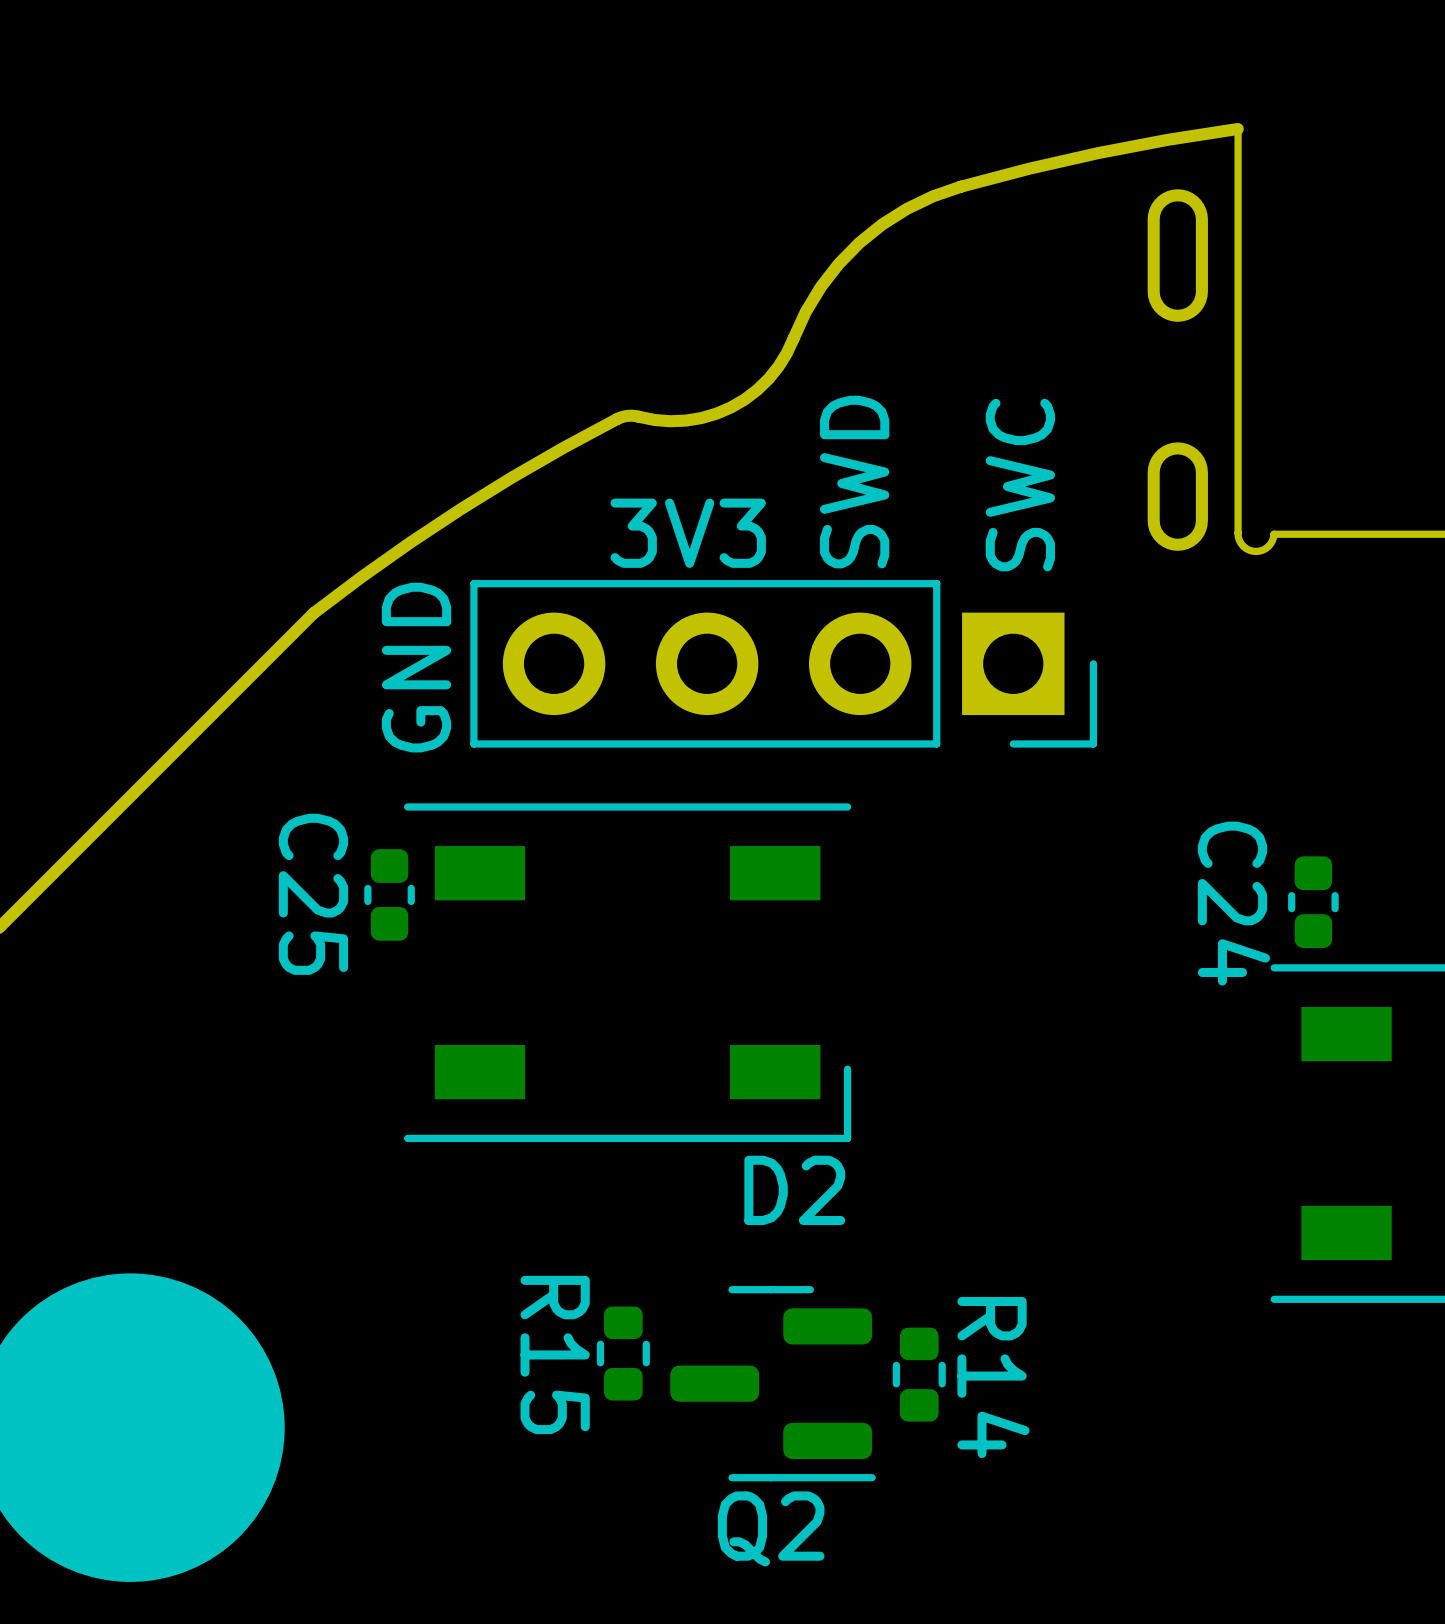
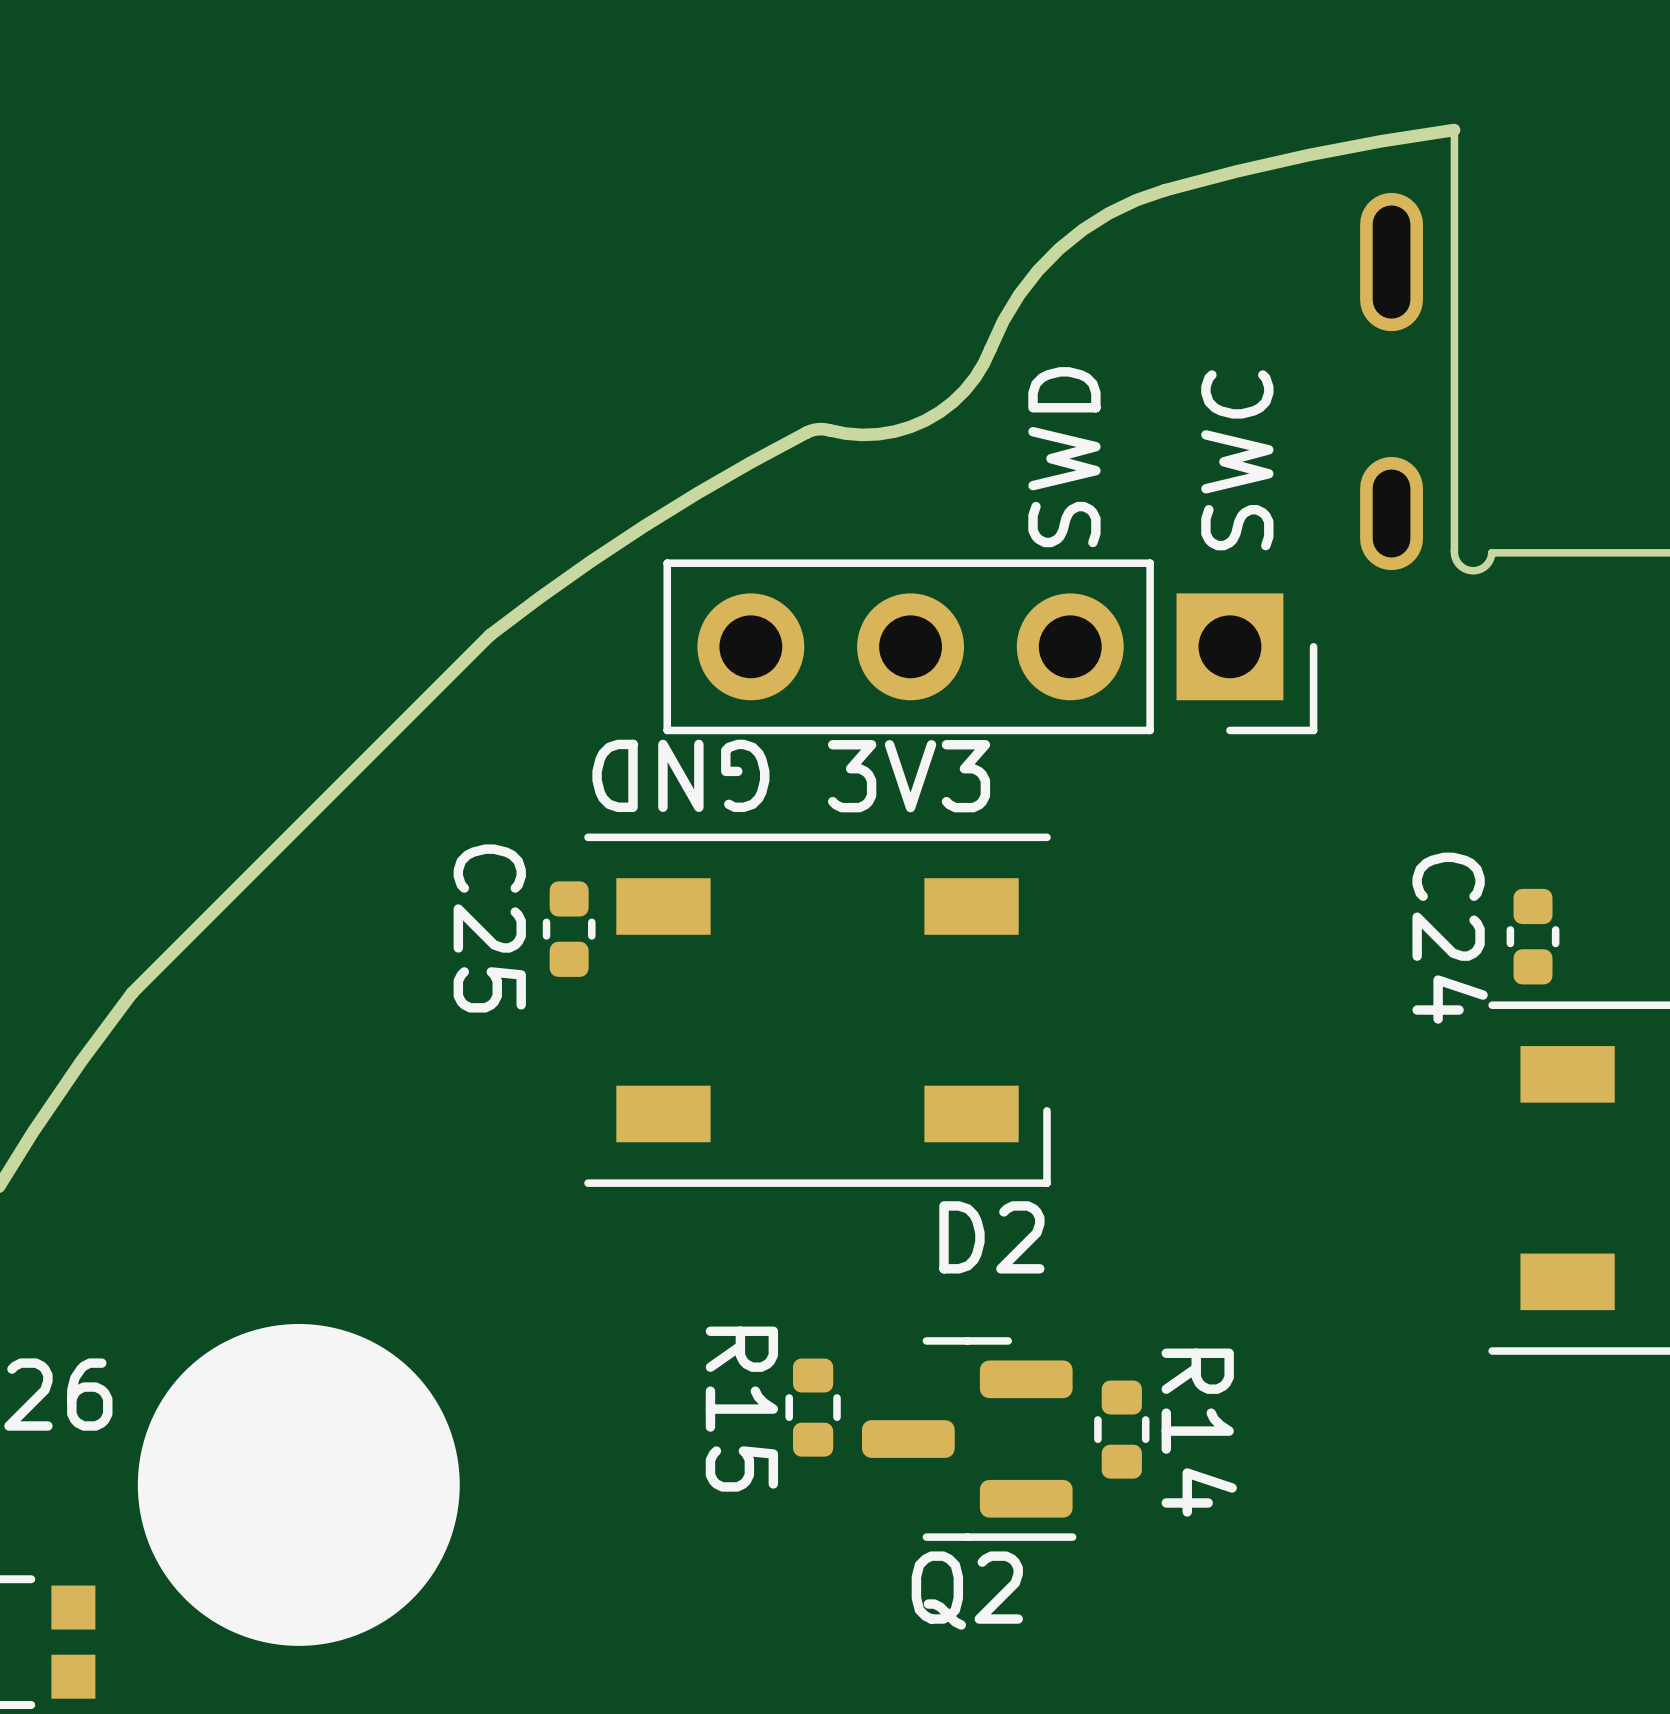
text position: SWD (854, 482) -> SWD (1064, 457)
text position: SWC (1020, 485) -> SWC (1237, 460)
text position: 3V3 (688, 533) -> 3V3 (909, 776)
part position: (783, 663) -> (990, 646)
text rotation: 0° (416, 667) -> 90° counterclockwise (680, 775)

